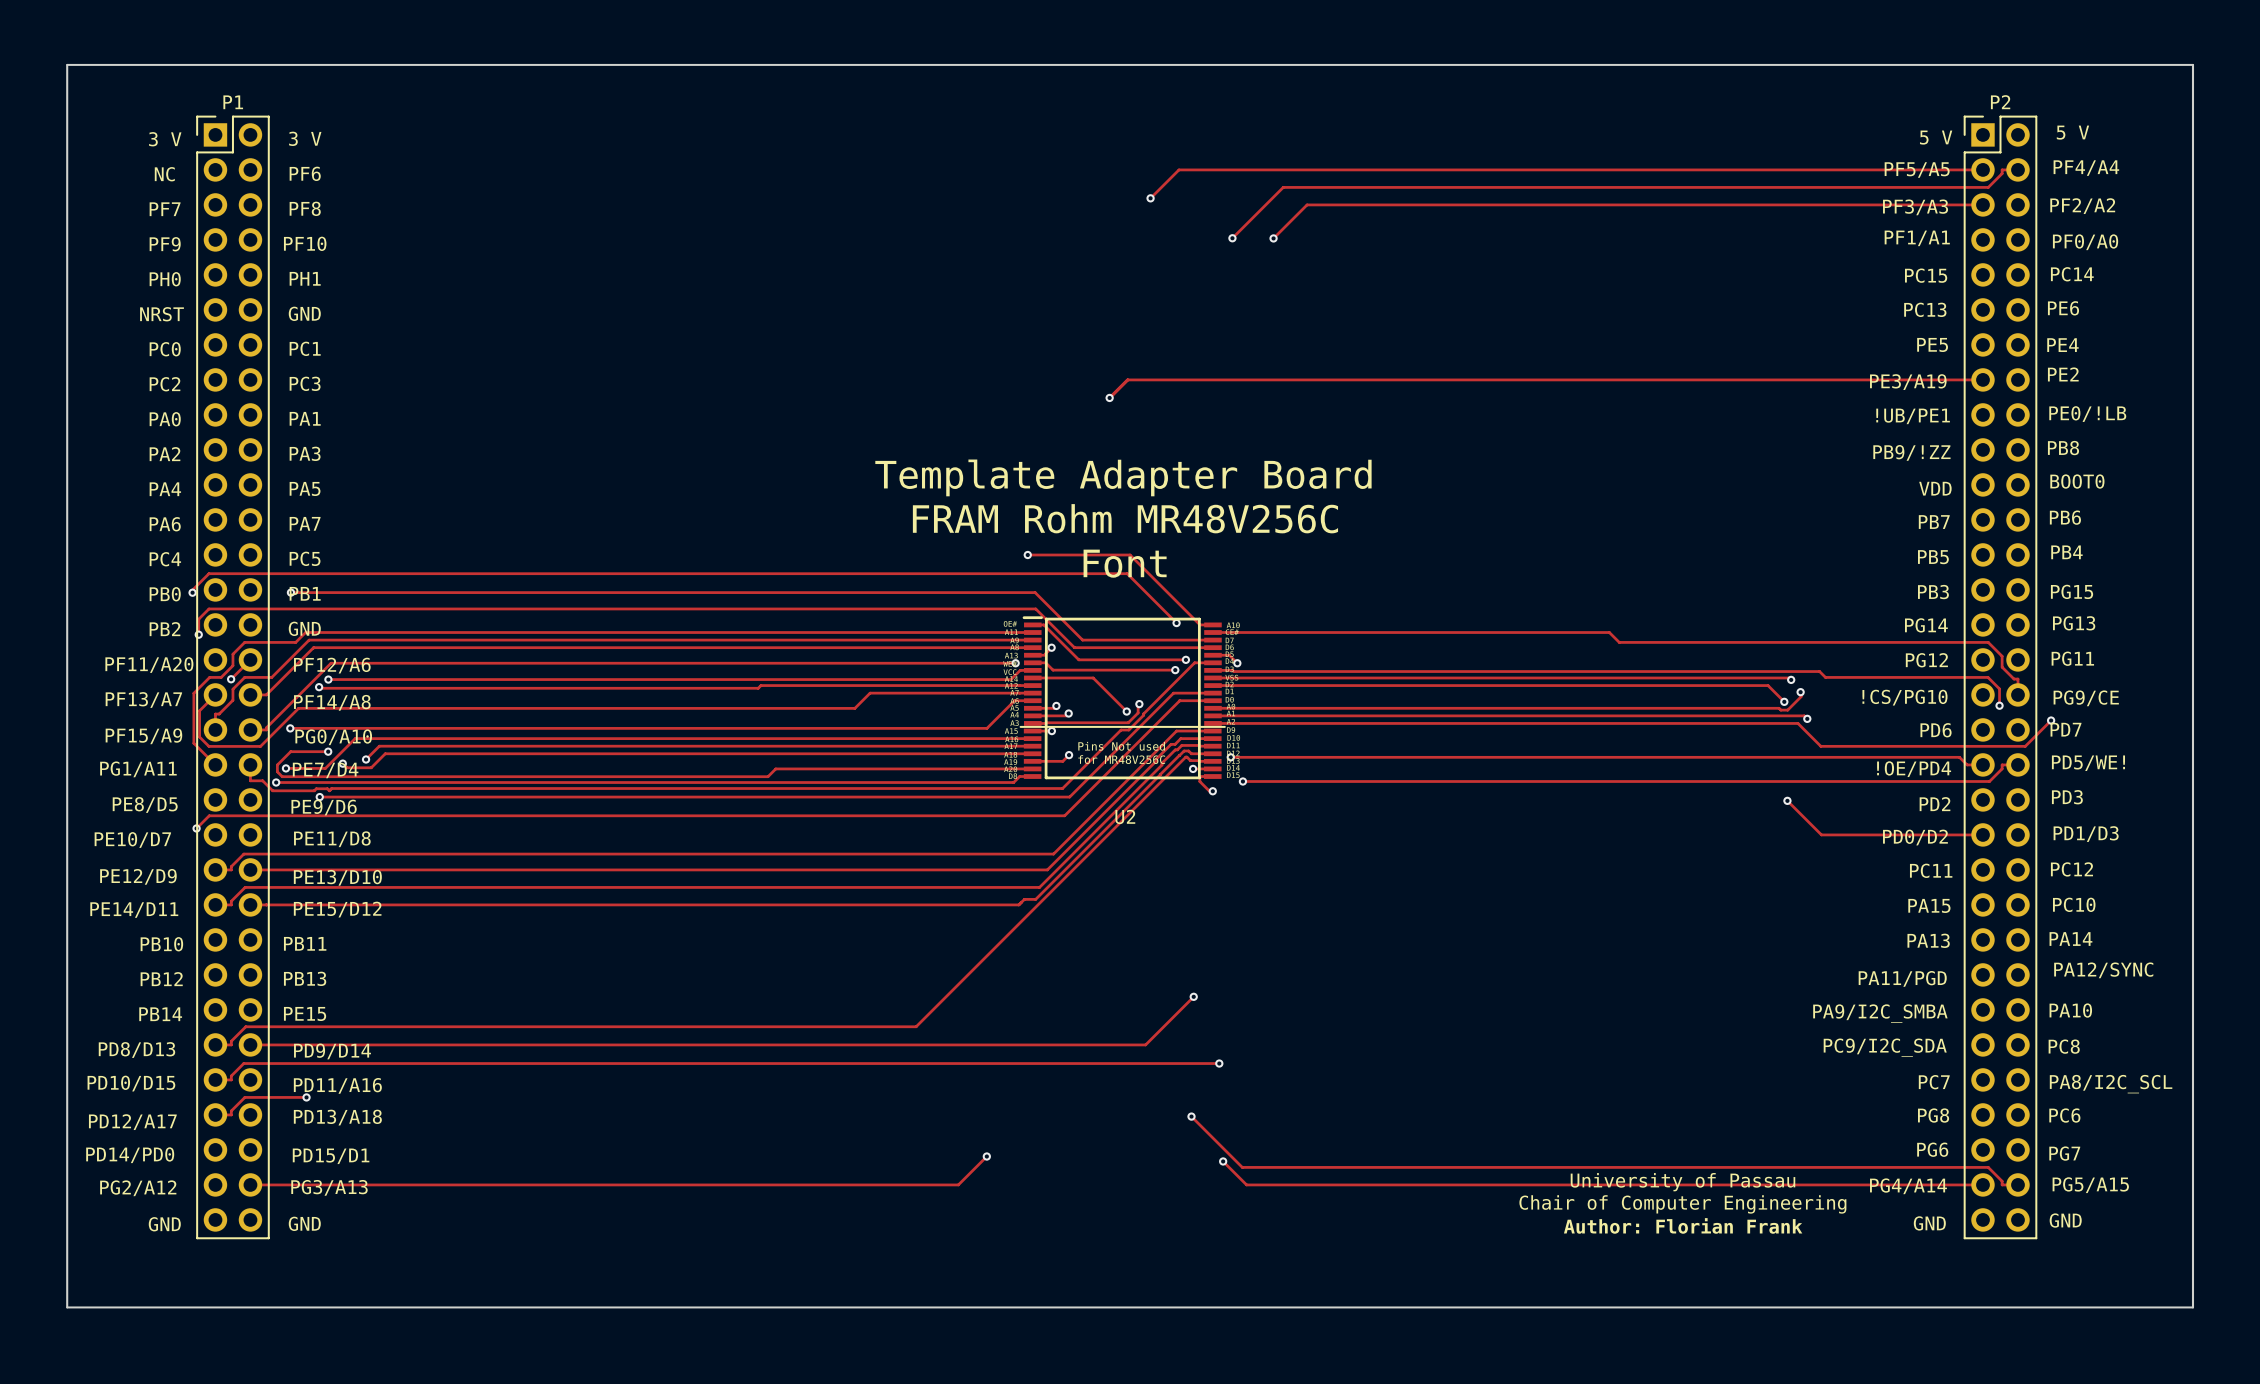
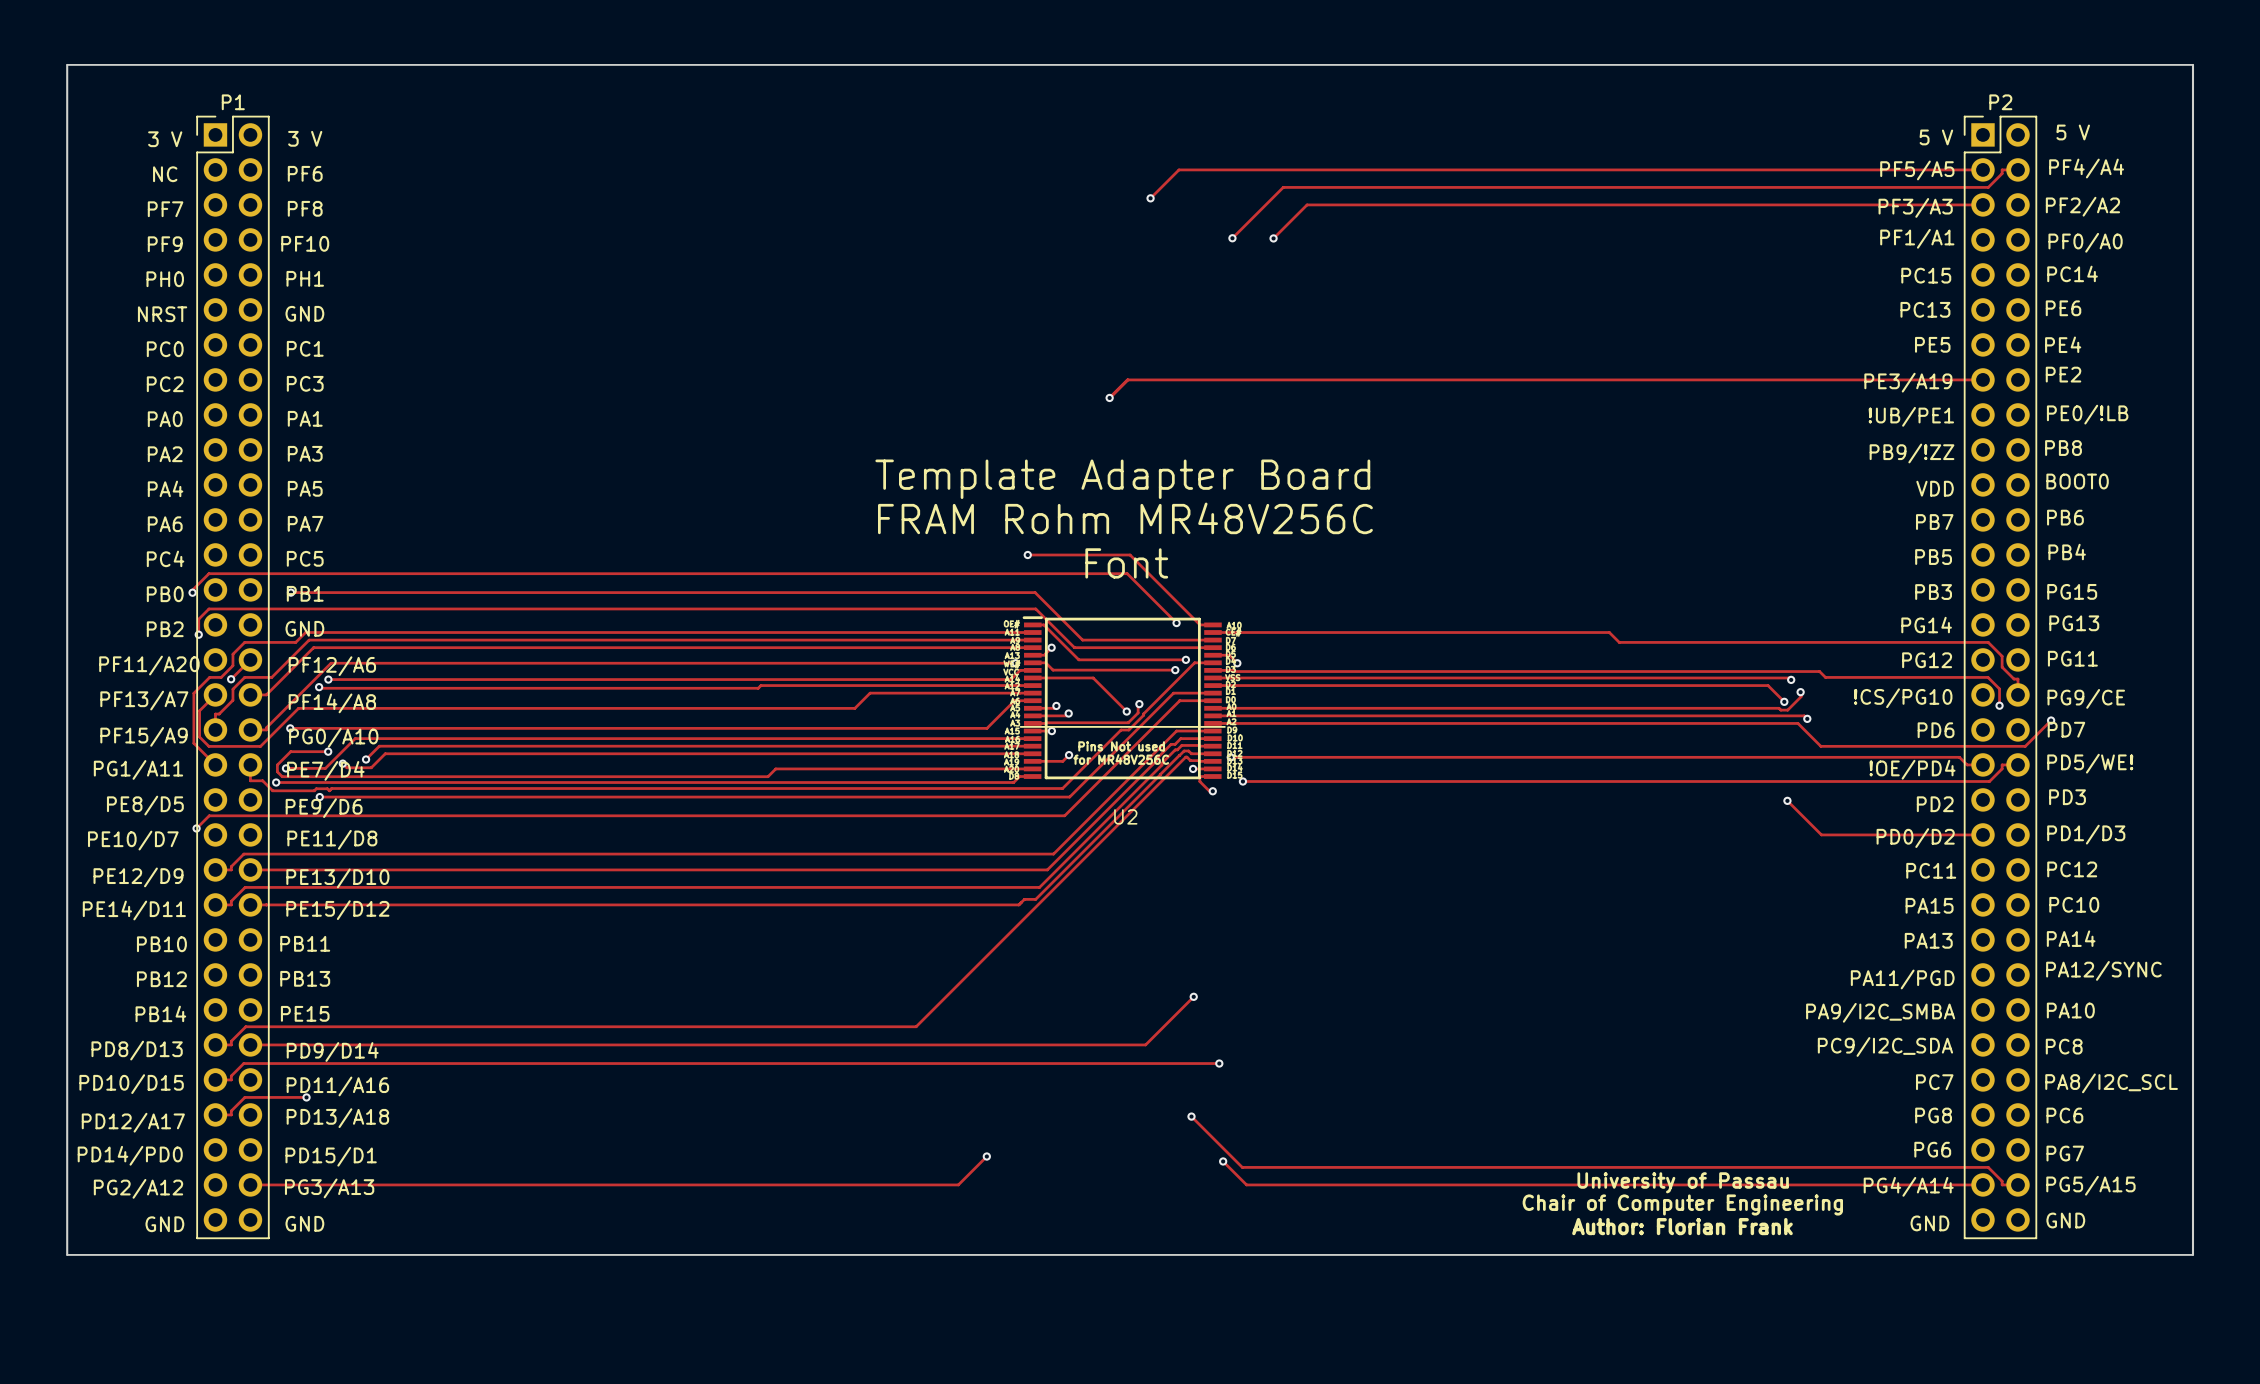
board edge: (67, 1254) (67, 1307) (2192, 1307) (2192, 1254) -> (67, 1254) (2192, 1254)

